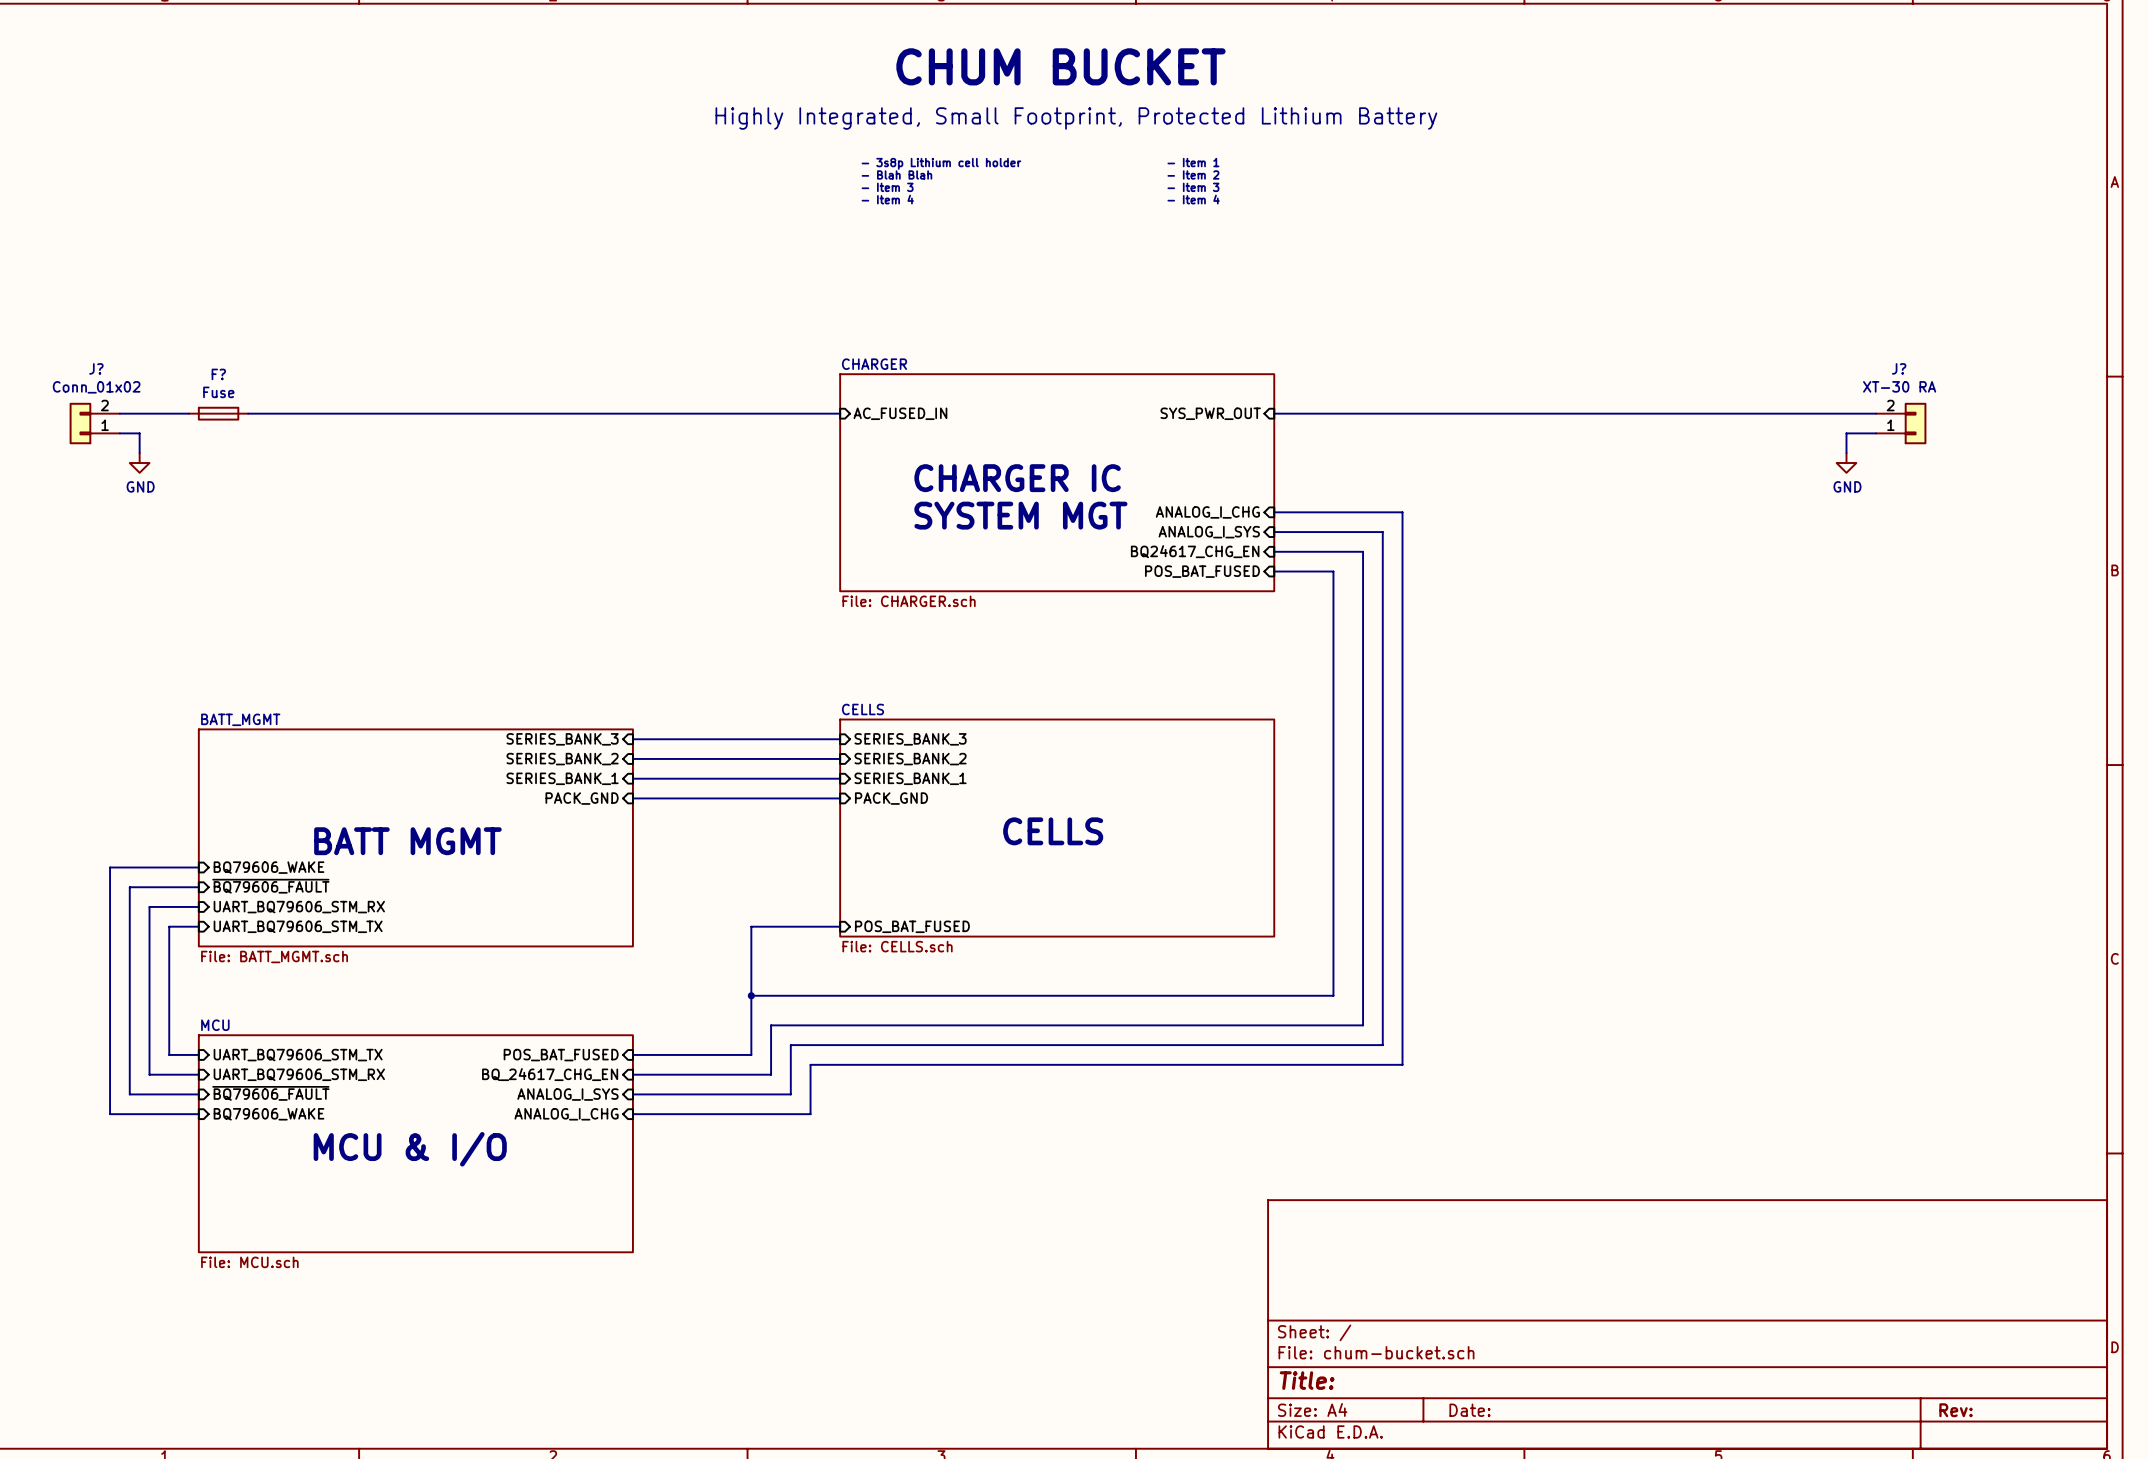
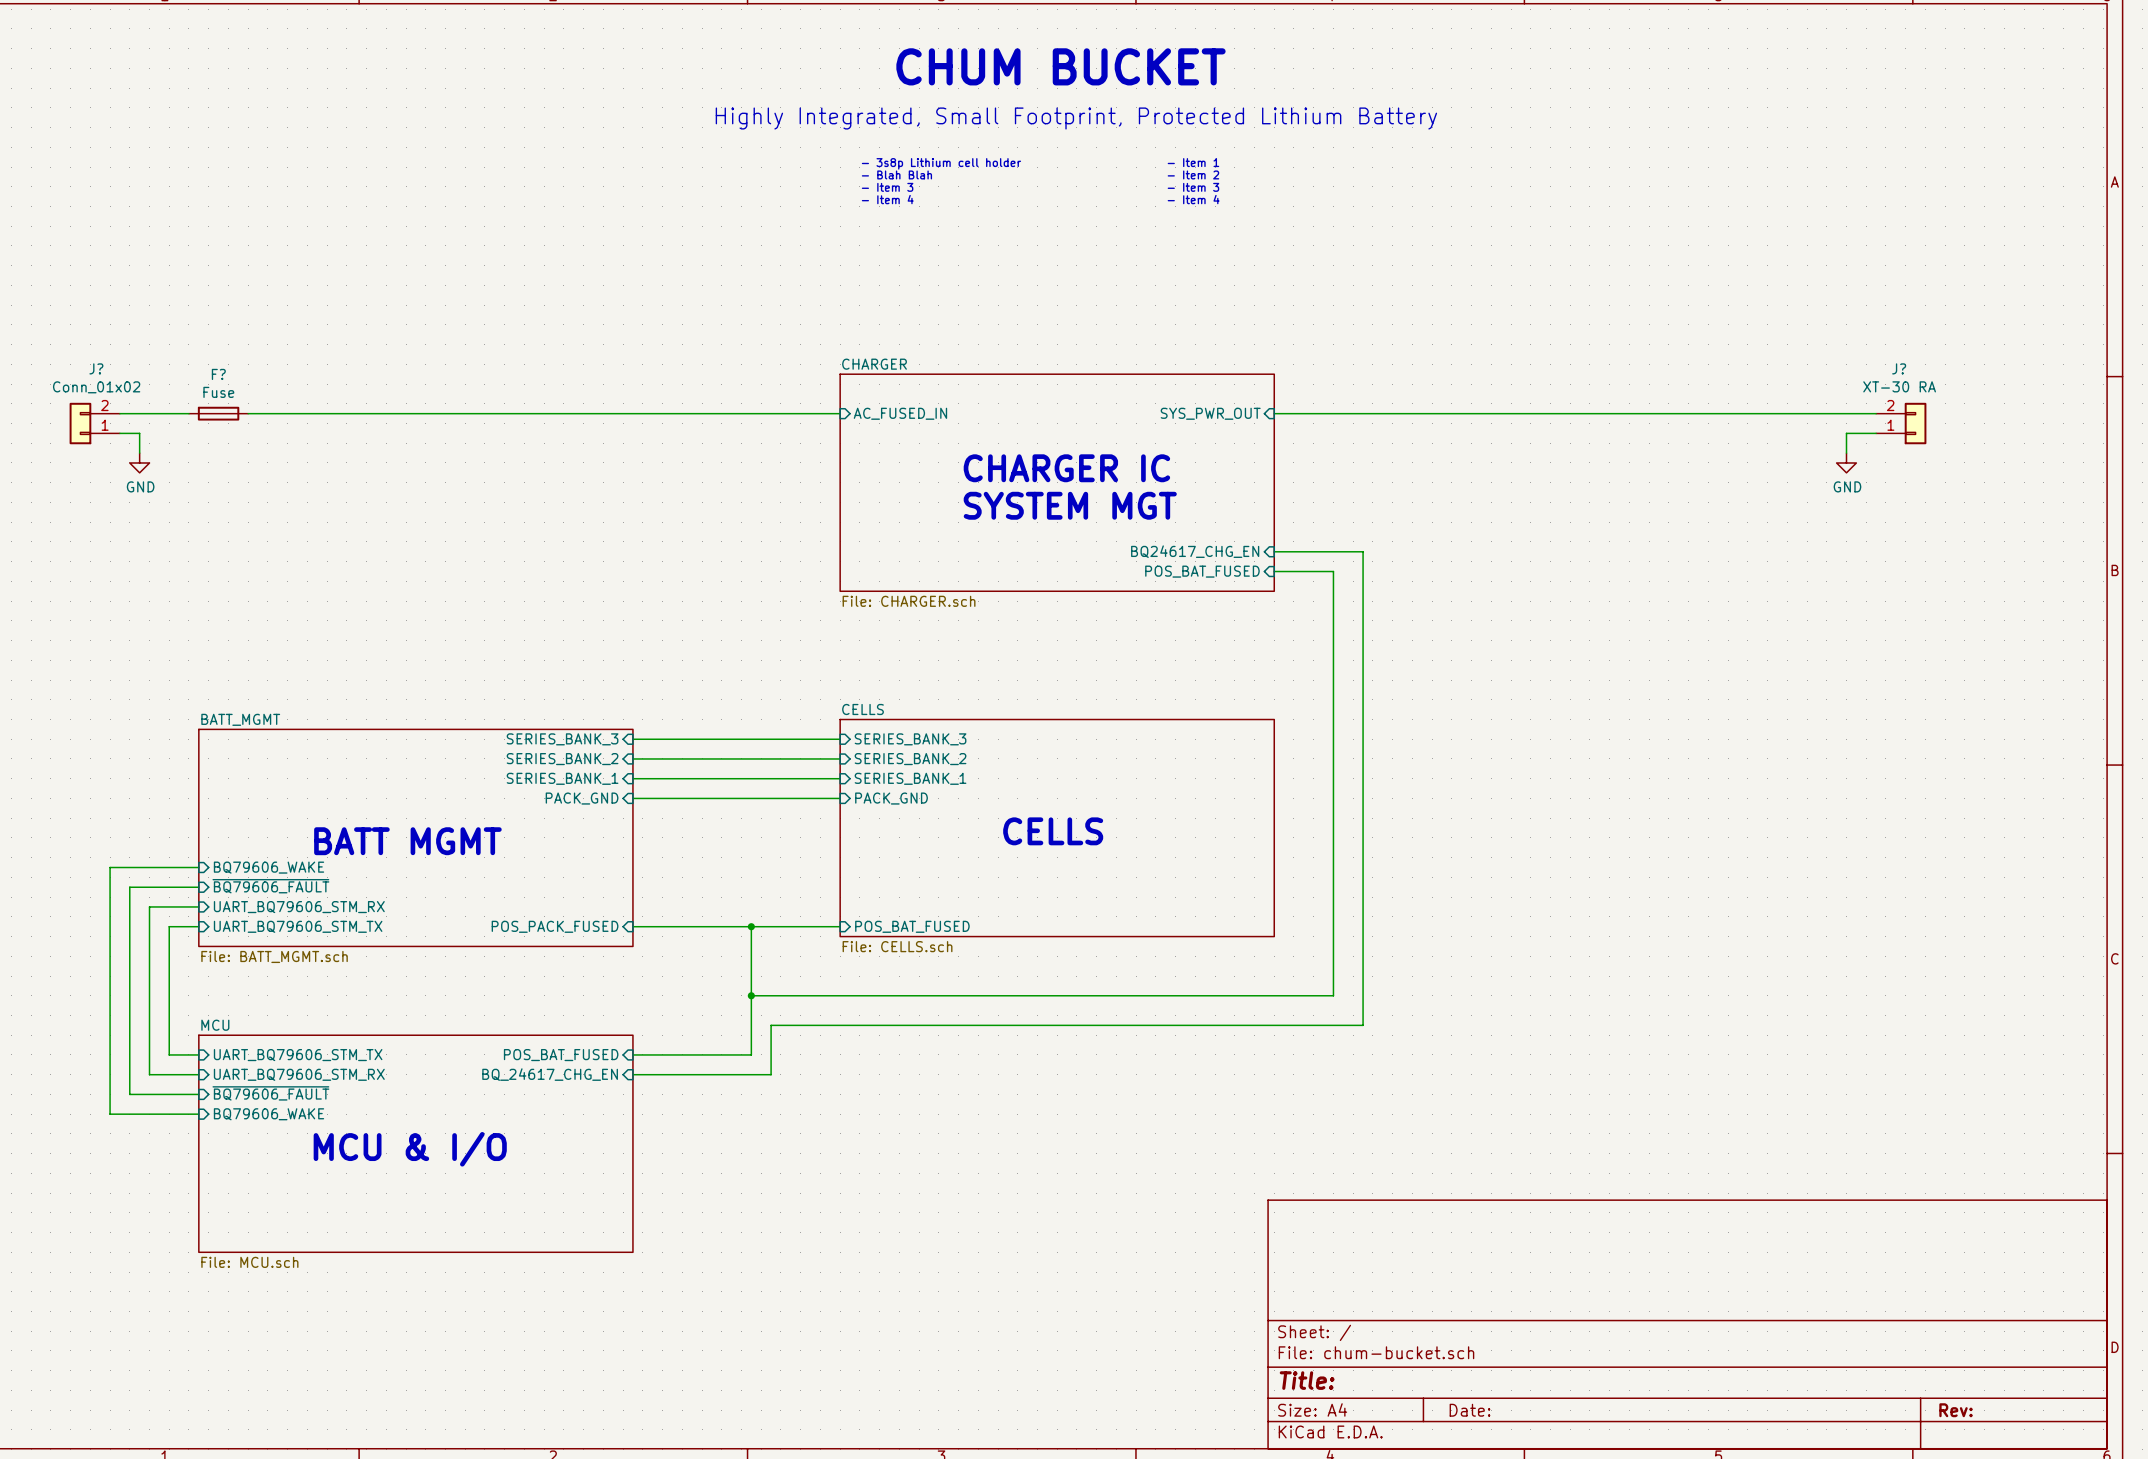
text position: CHARGER IC (1017, 478) -> CHARGER IC (1066, 468)
sheet pin: ANALOG_I_CHG (1207, 512) -> none
wire: (1274, 512) (1402, 512) (1402, 1064) (810, 1064) (810, 1114) (632, 1114) -> none
text position: SYSTEM MGT (1020, 515) -> SYSTEM MGT (1070, 505)
sheet pin: ANALOG_I_SYS (1209, 532) -> none
wire: (1274, 532) (1382, 532) (1382, 1045) (790, 1045) (790, 1094) (632, 1094) -> none
sheet pin: none -> POS_PACK_FUSED (555, 926)
wire: none -> (632, 926) (751, 926)
junction: none -> (751, 926)
sheet pin: ANALOG_I_SYS (567, 1094) -> none
sheet pin: ANALOG_I_CHG (566, 1114) -> none

